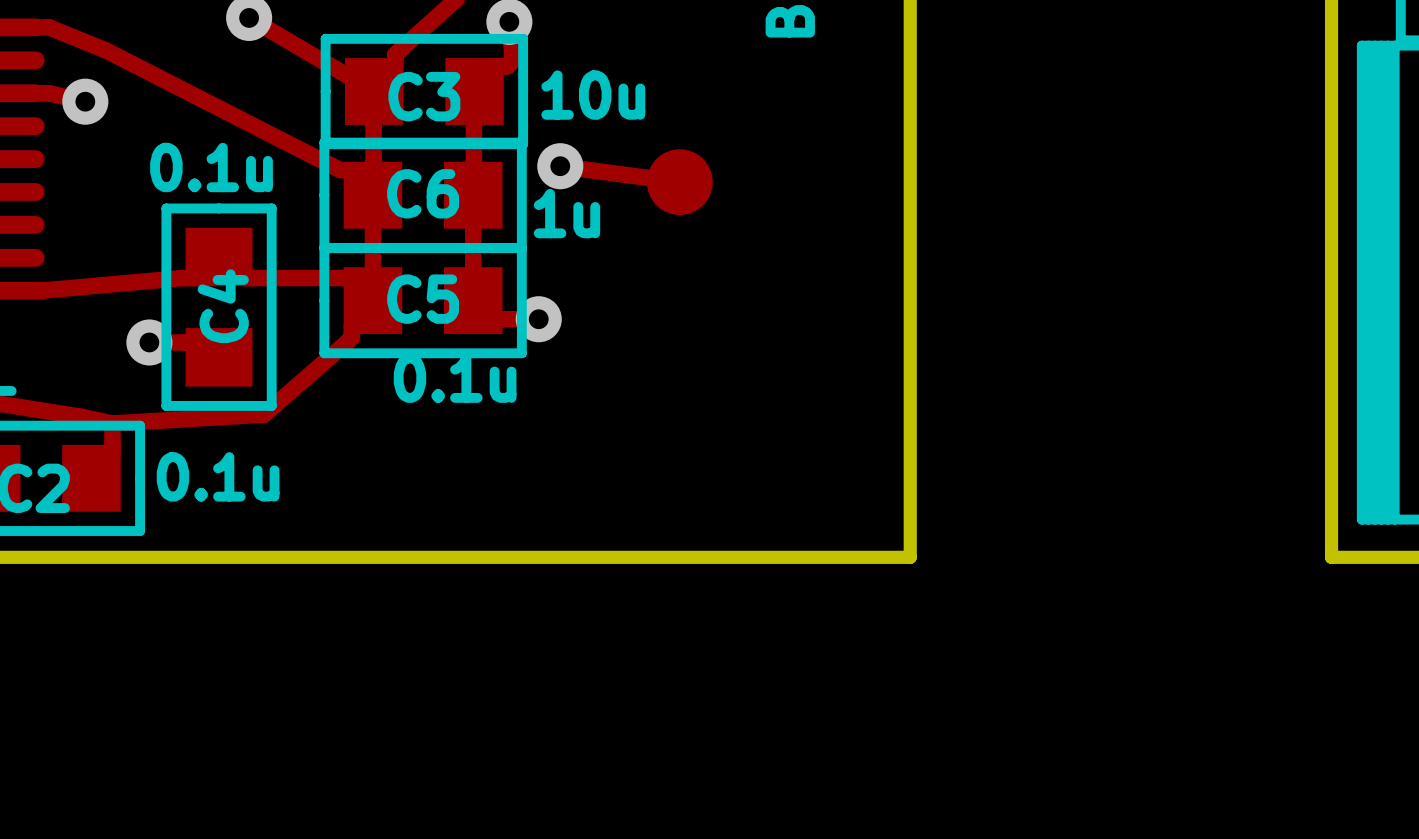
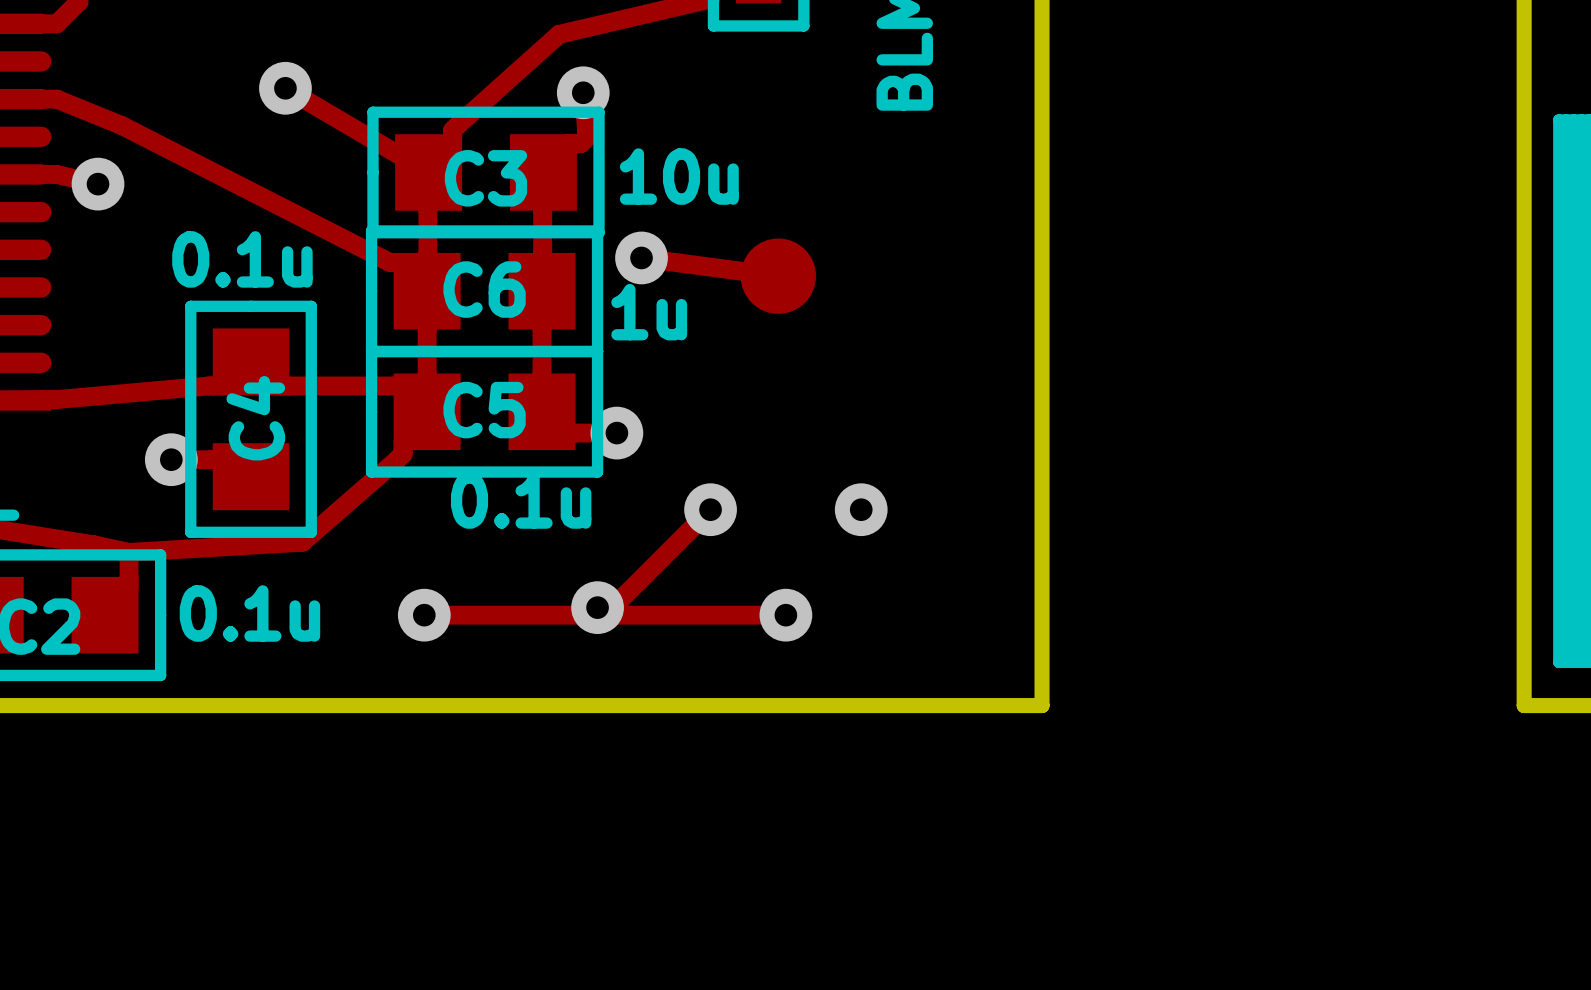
track: none -> (710, 509) (612, 607) (597, 607)
via: none -> (710, 509)
via: none -> (861, 509)
via: none -> (597, 607)
track: none -> (424, 615) (785, 615)
via: none -> (424, 615)
via: none -> (785, 615)

